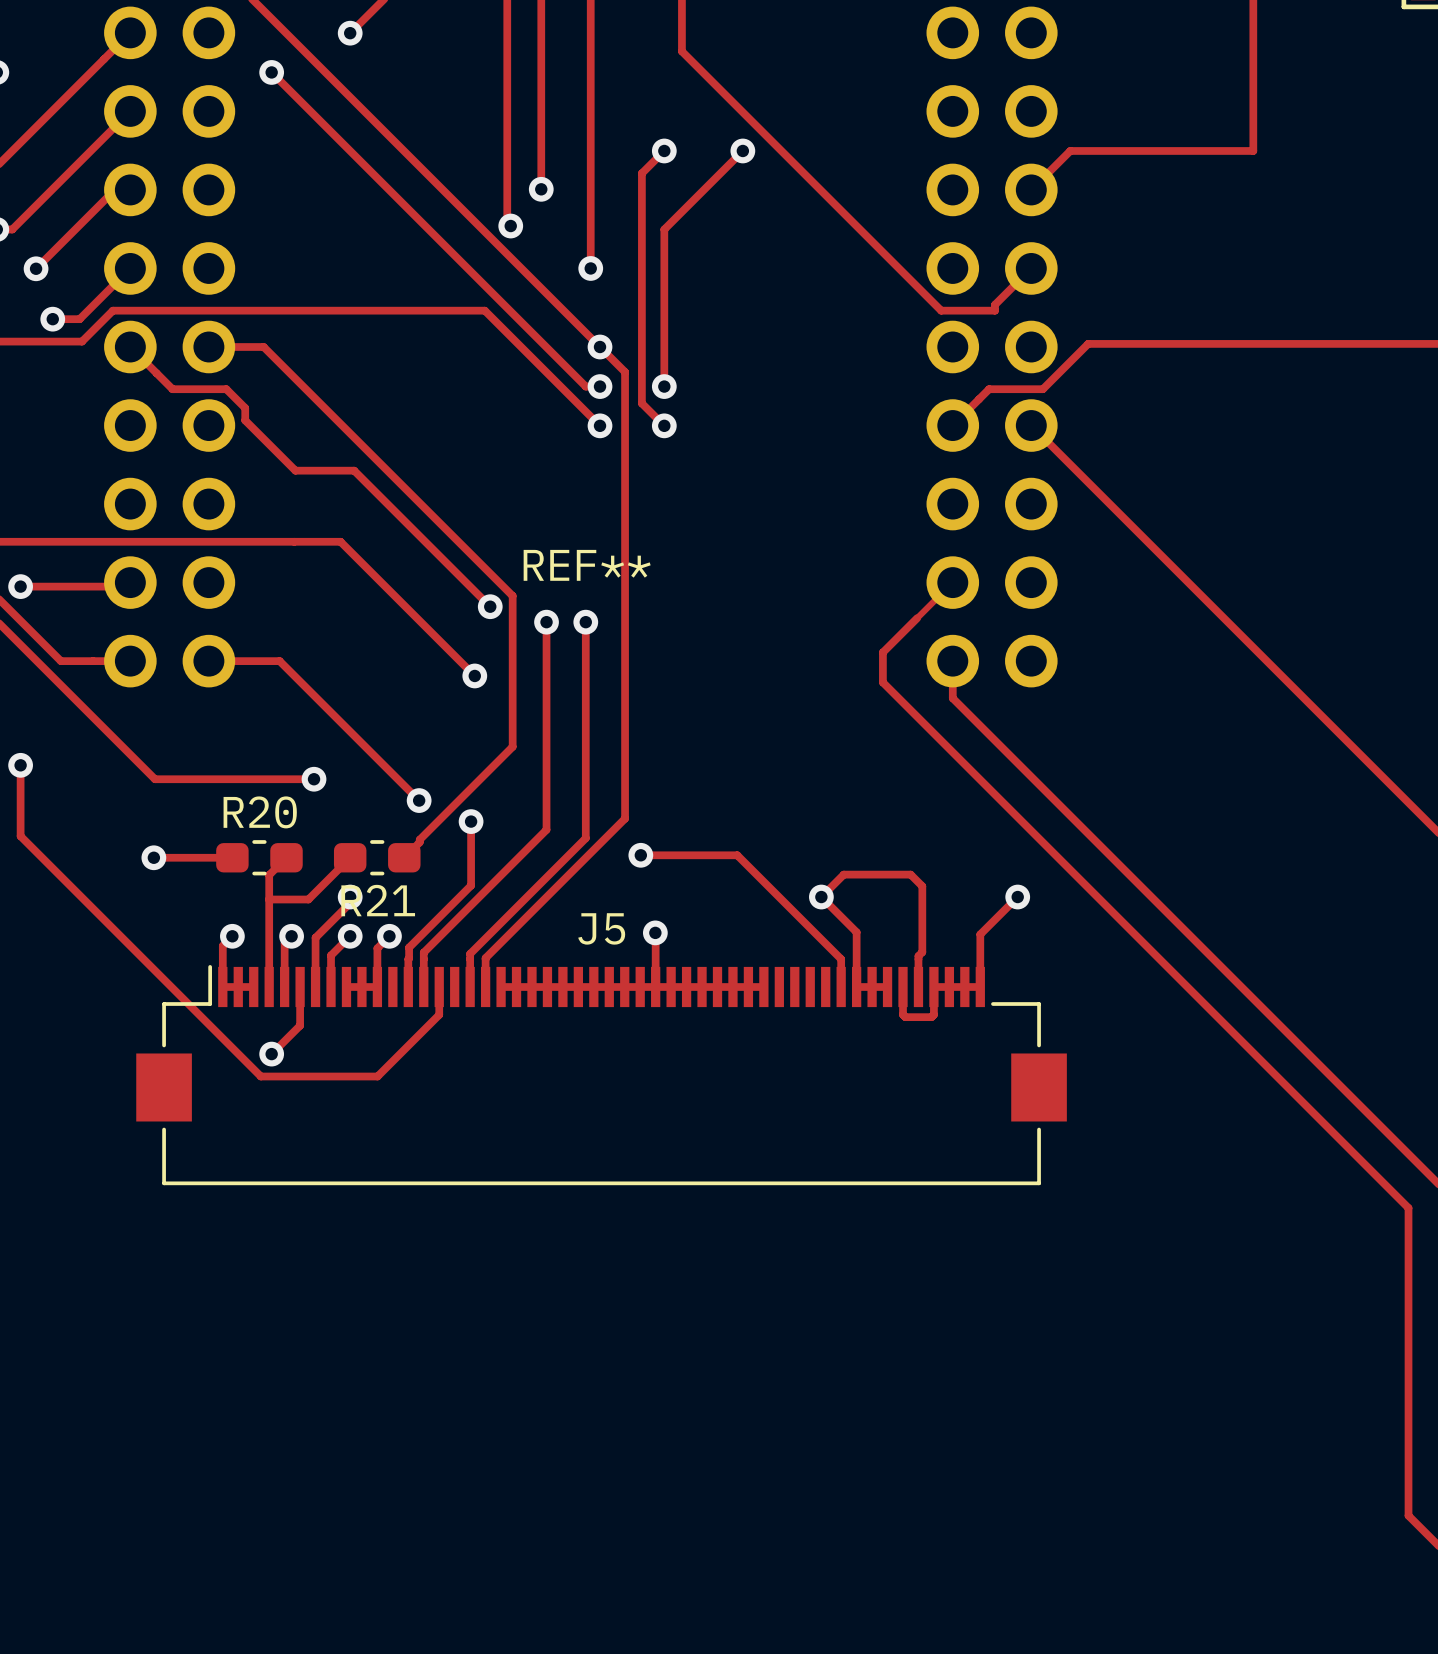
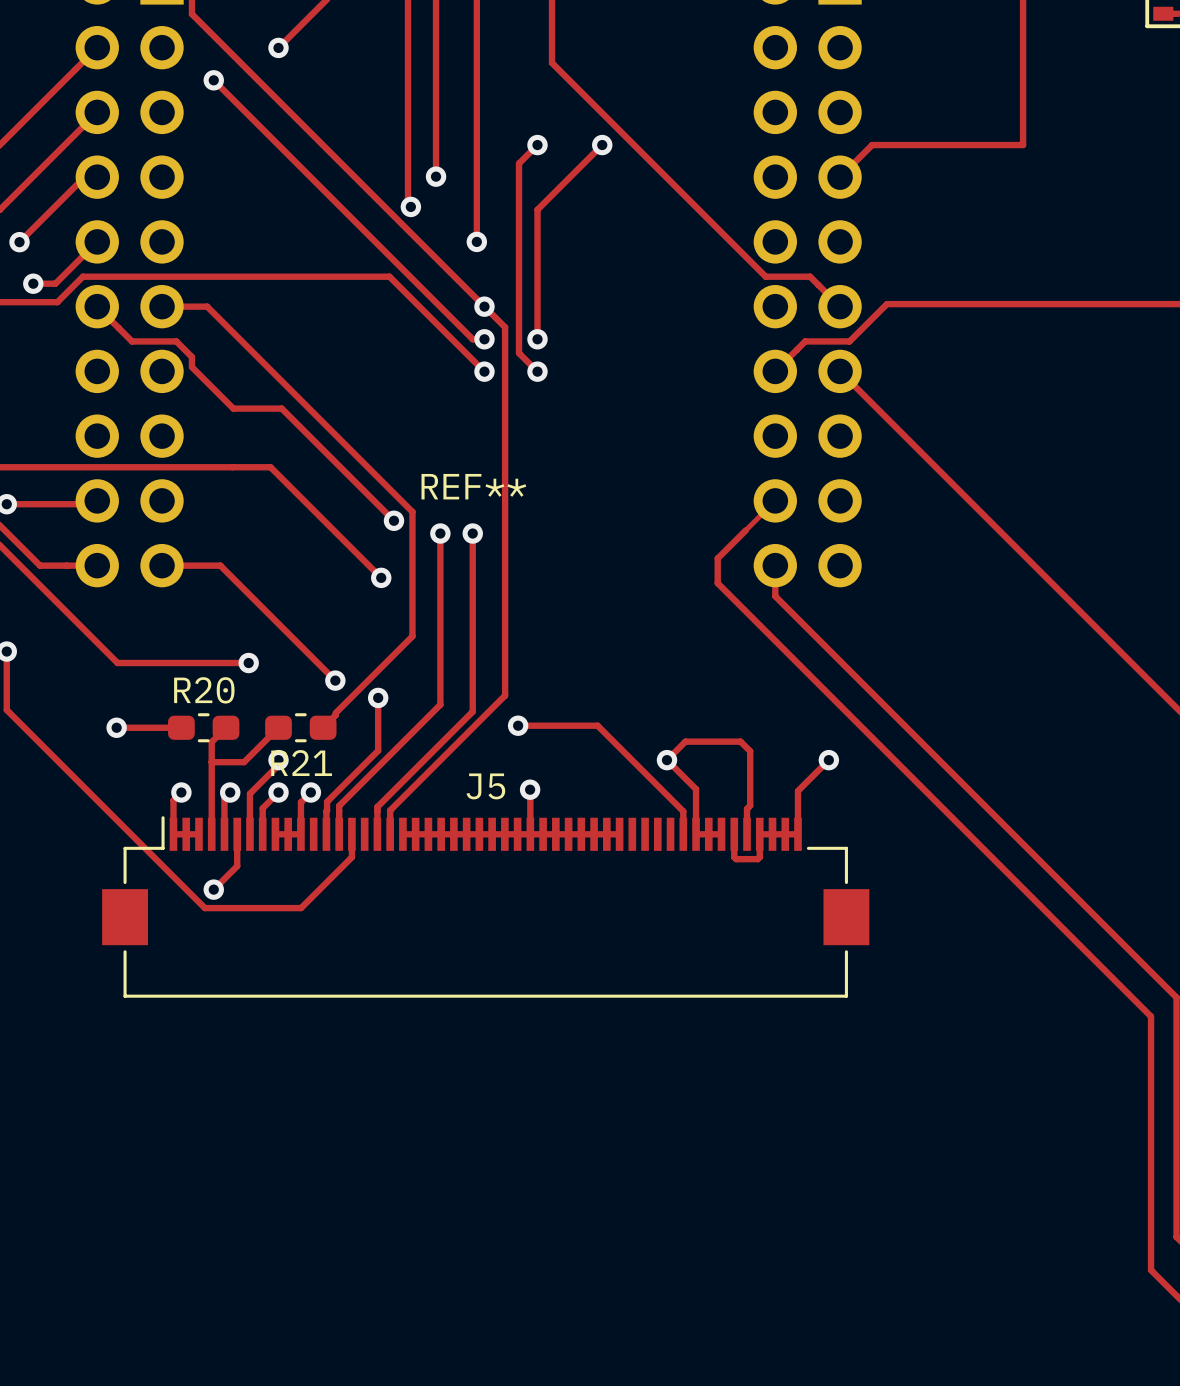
track: (1031, 268) (994, 304) (994, 310) -> (840, 306) (810, 276)

